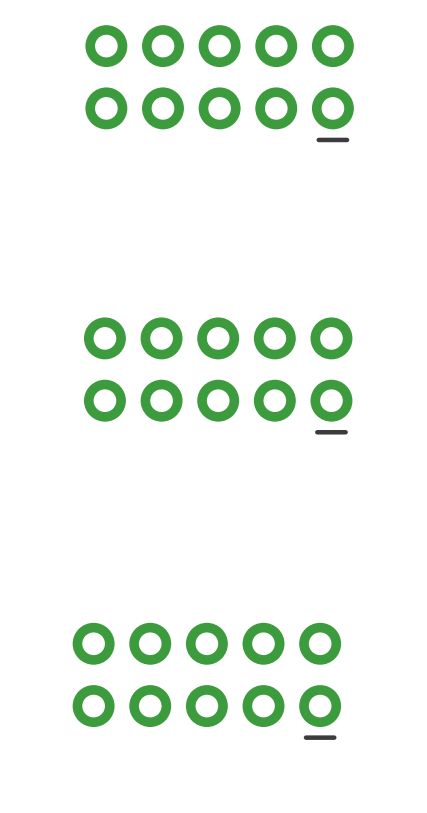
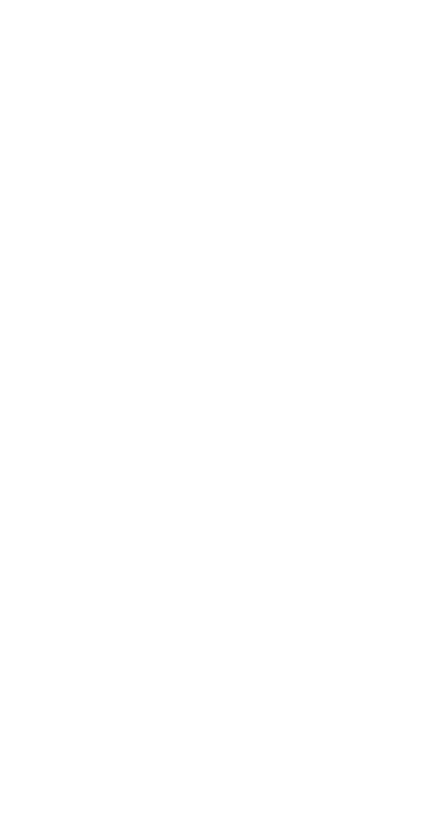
part: (219, 83) -> none
part: (218, 375) -> none
part: (206, 681) -> none

